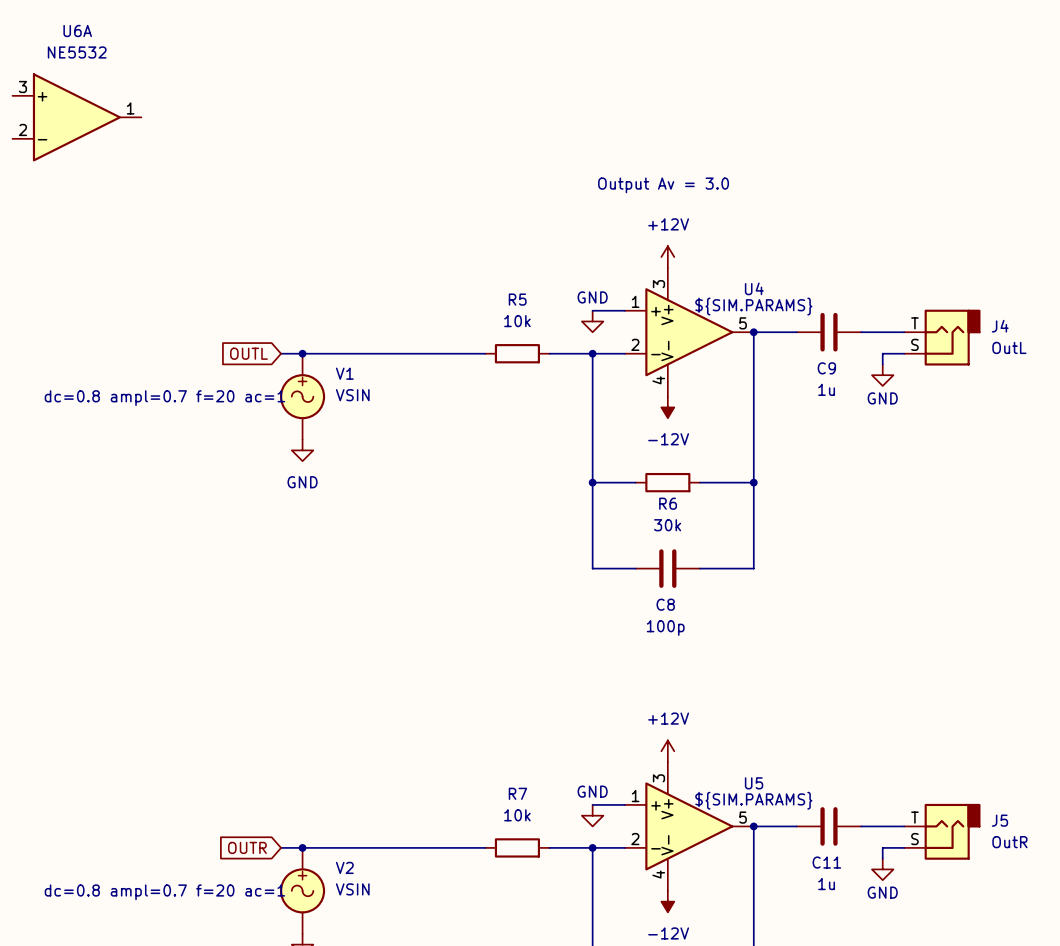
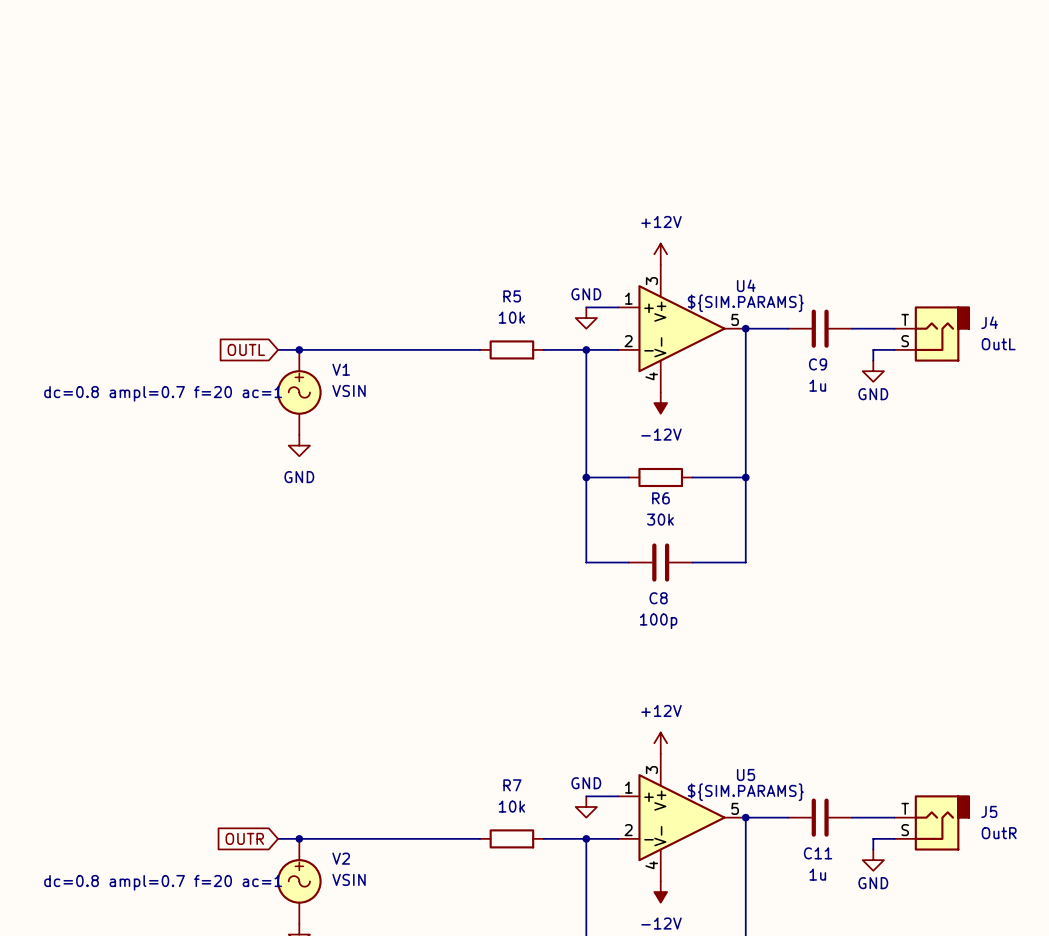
U6A: NE5532 (76, 117) -> none
text: Output Av = 3.0 (663, 185) -> none

